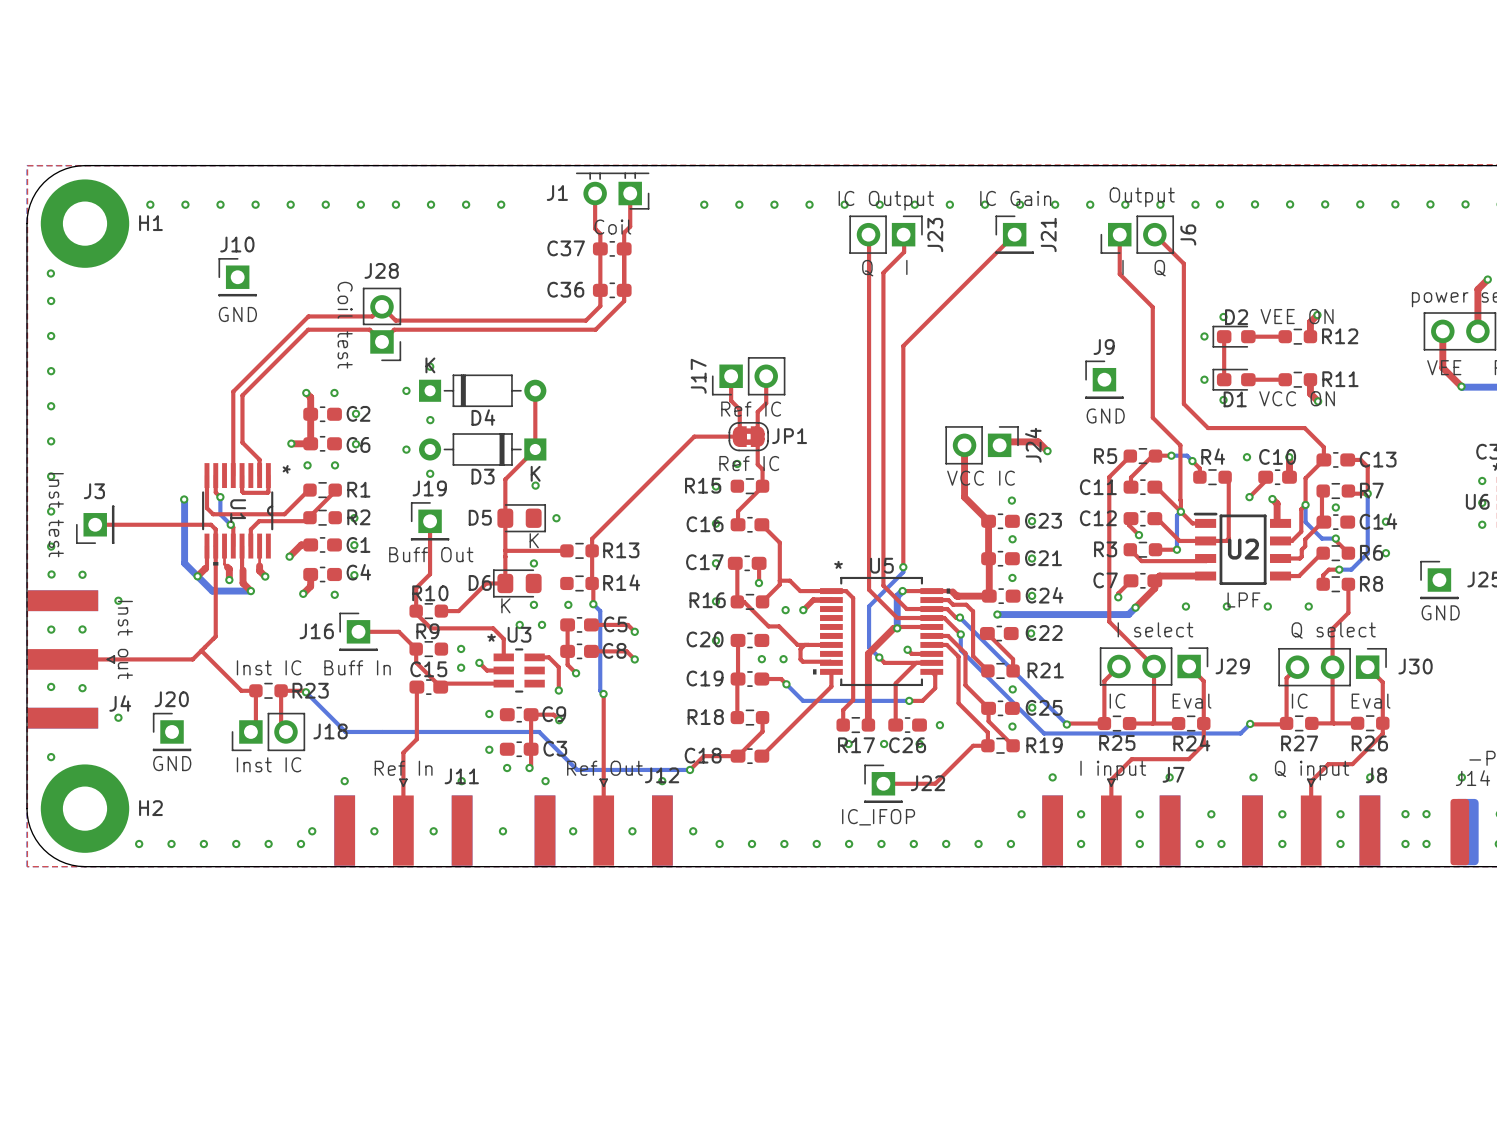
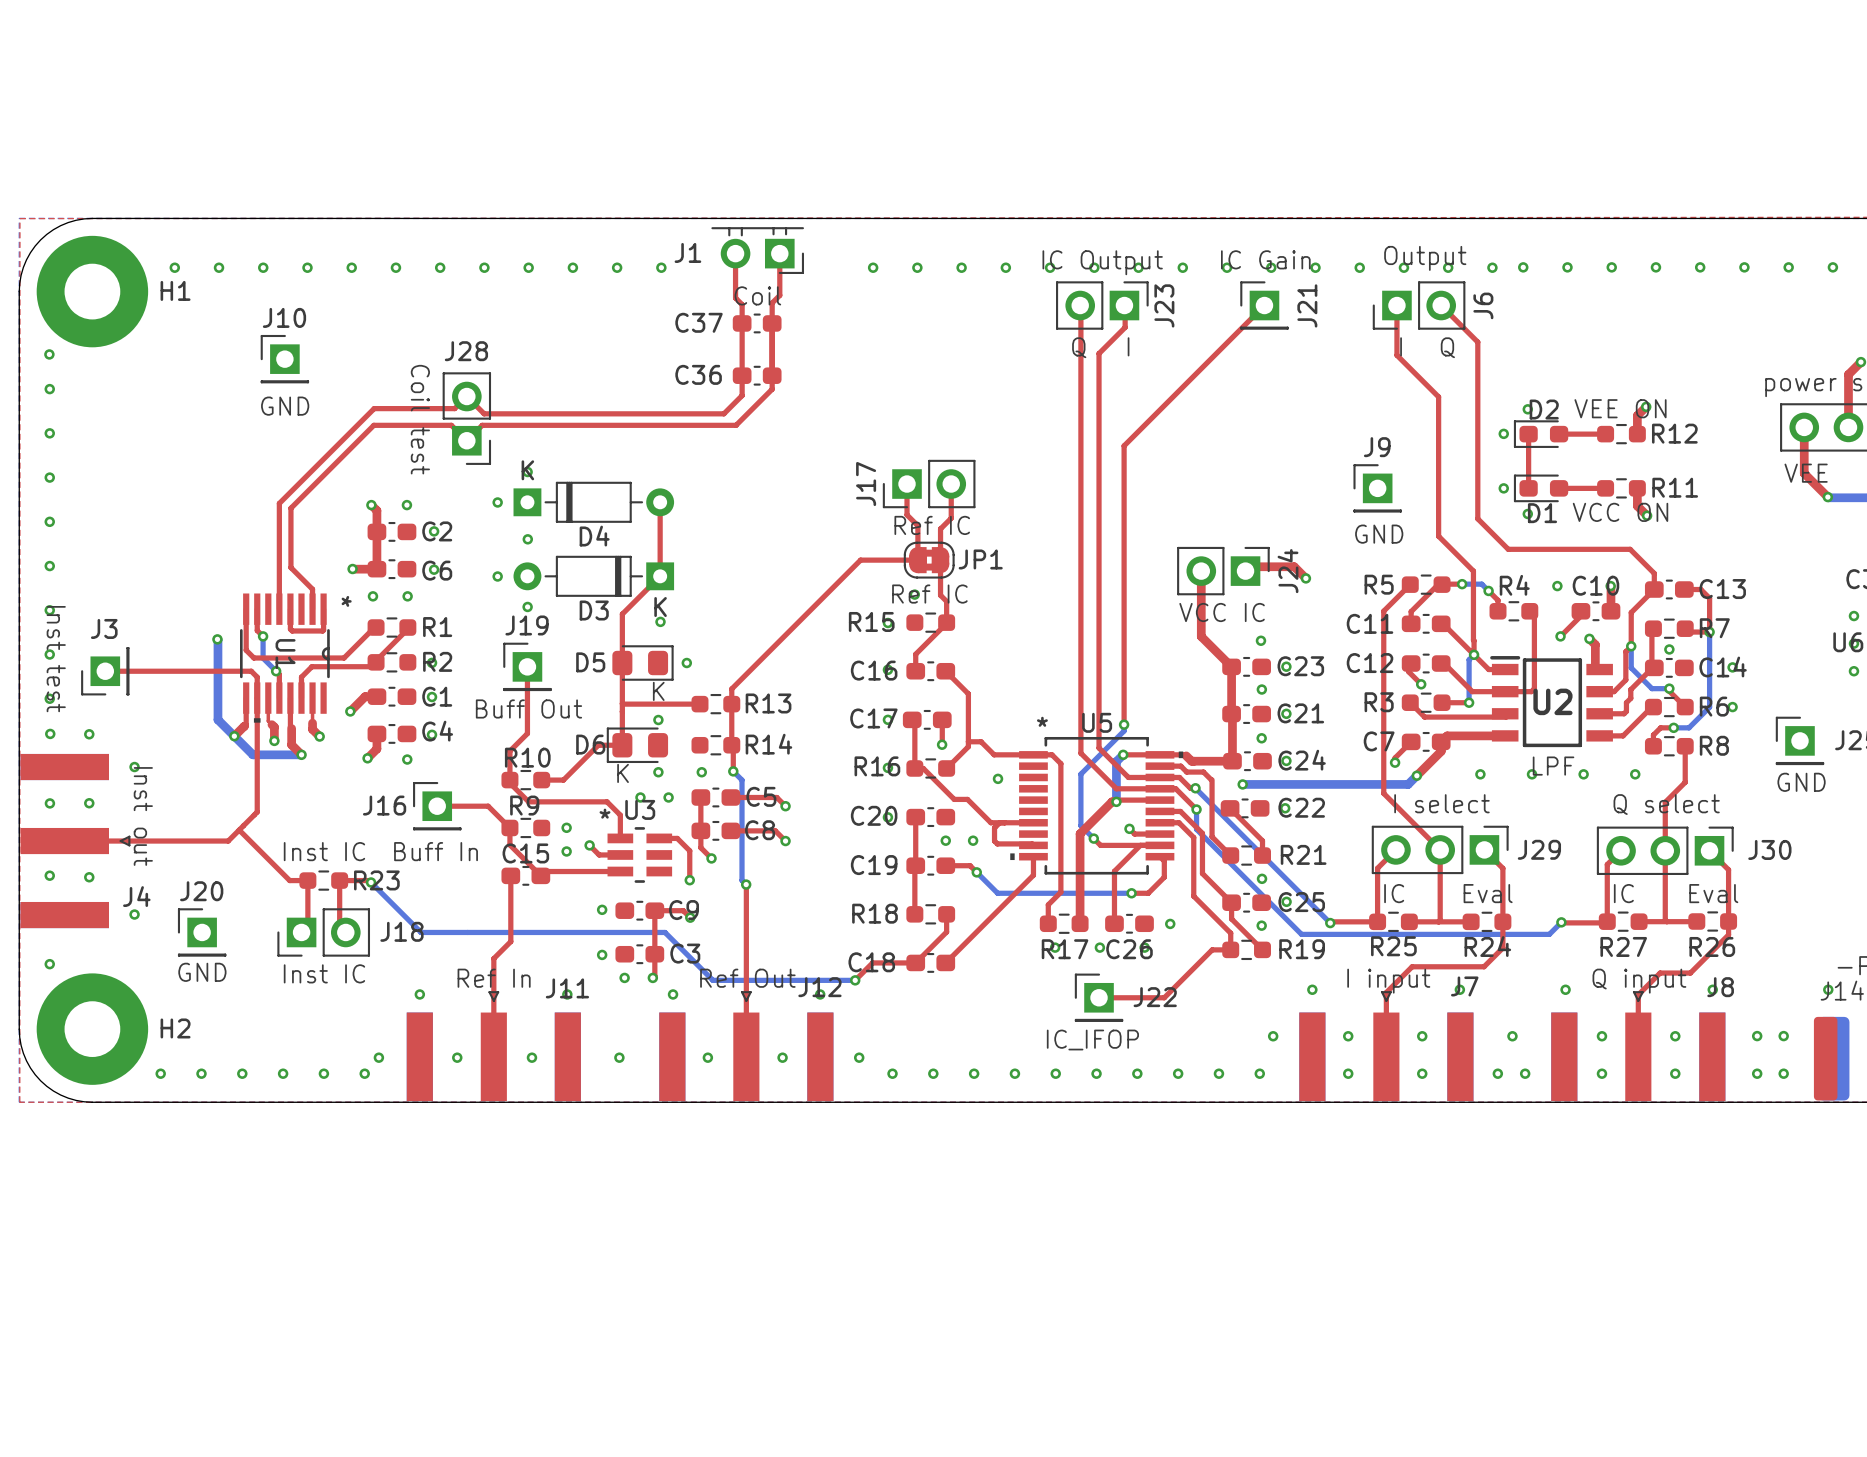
via: none -> (661, 267)
top track: (831, 600) (813, 600) (803, 610) -> none
via: (785, 610) -> none

